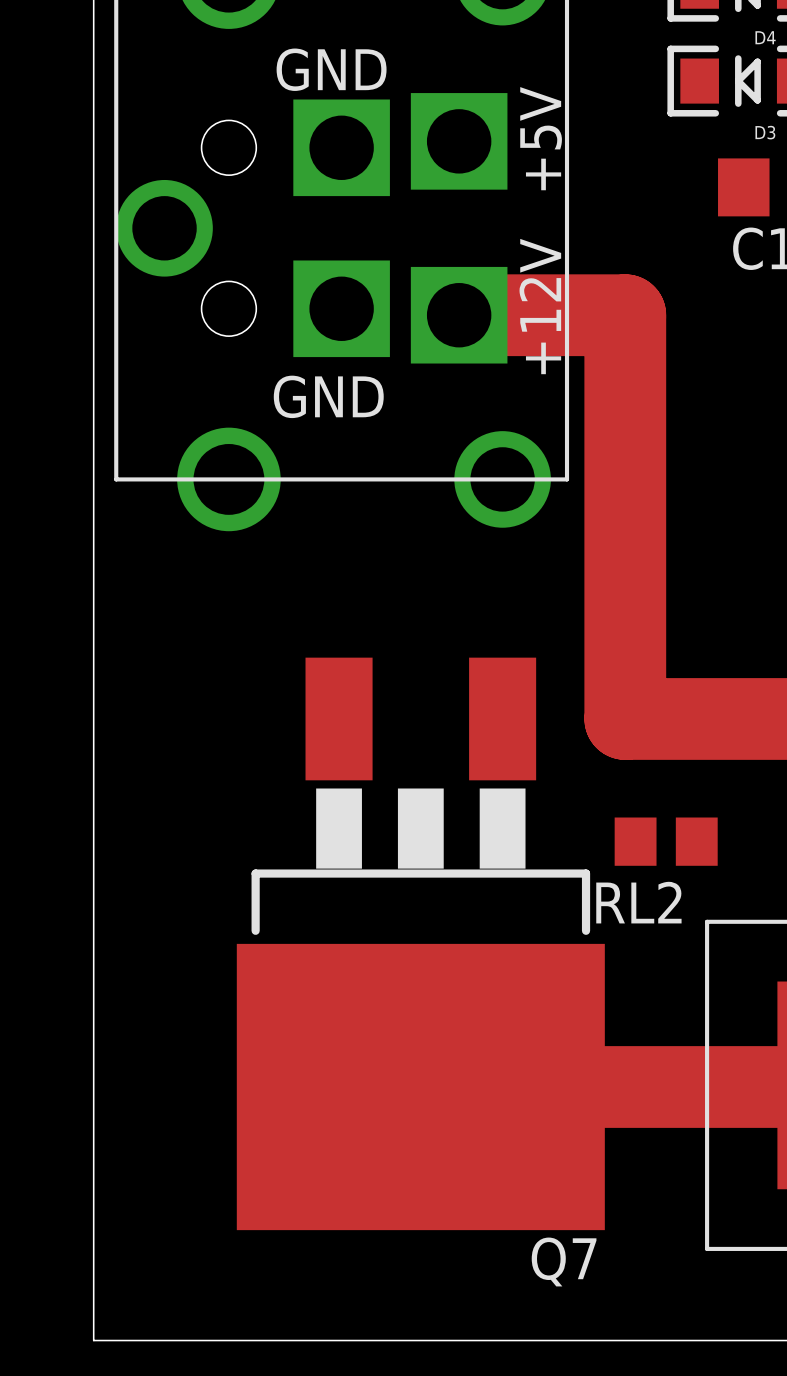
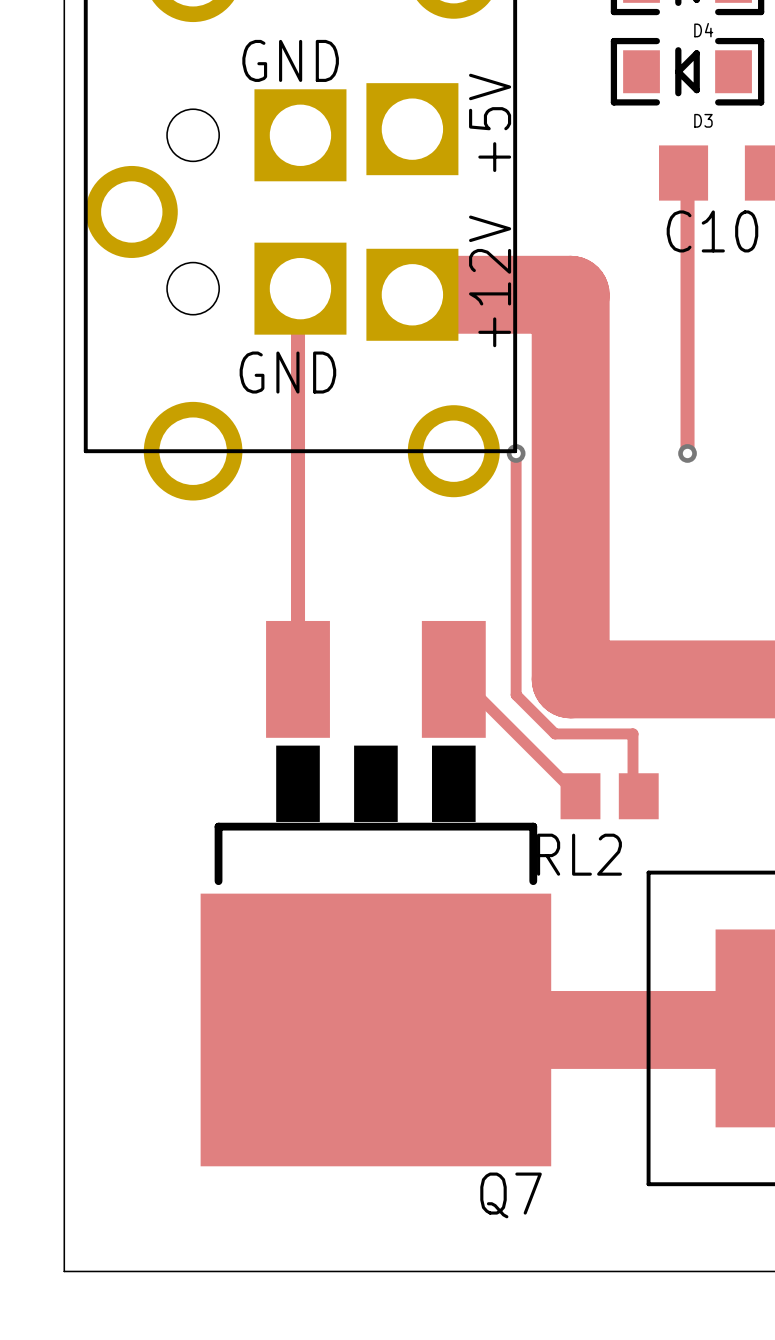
track: none -> (683, 173) (687, 173) (687, 453)
track: none -> (300, 288) (298, 289) (298, 679)
track: none -> (516, 453) (516, 694) (555, 733) (632, 733) (632, 796) (638, 796)
via: none -> (516, 453)
via: none -> (687, 453)
track: none -> (453, 679) (461, 679) (580, 796)

